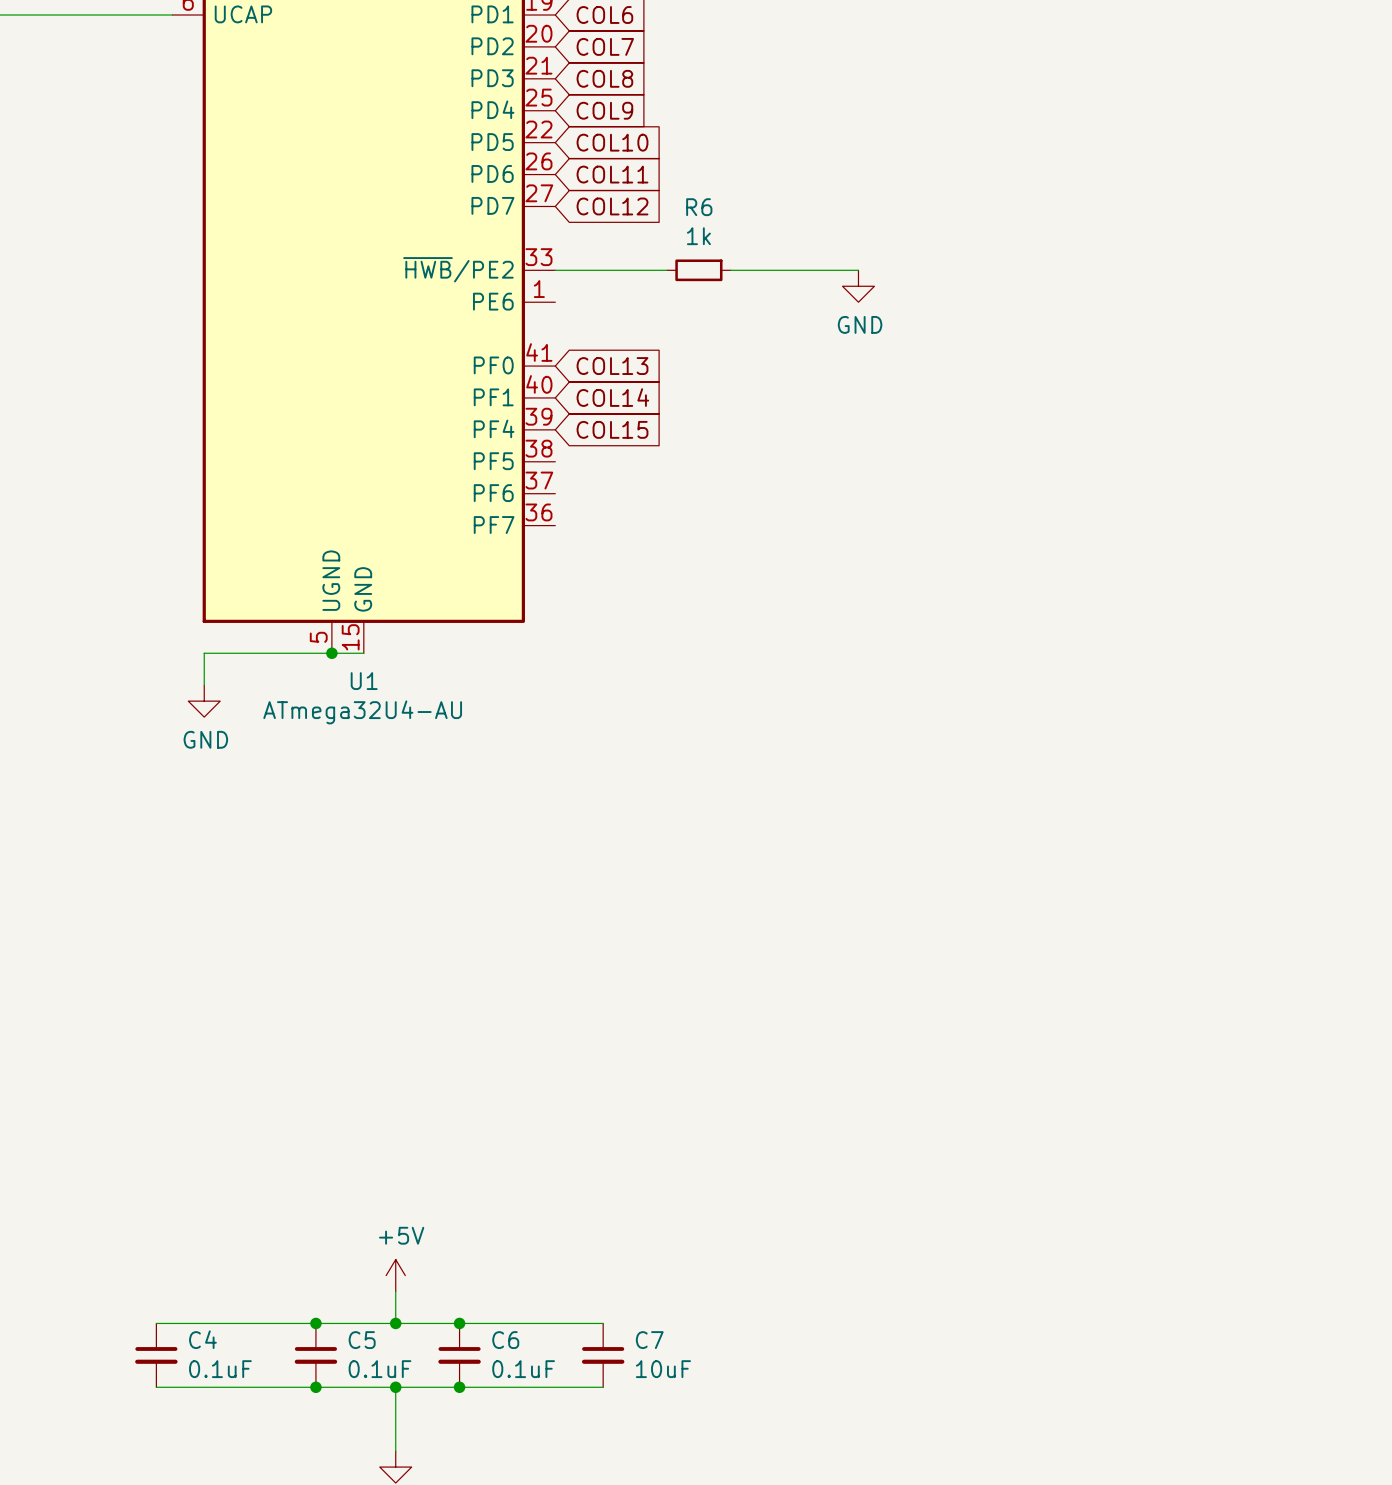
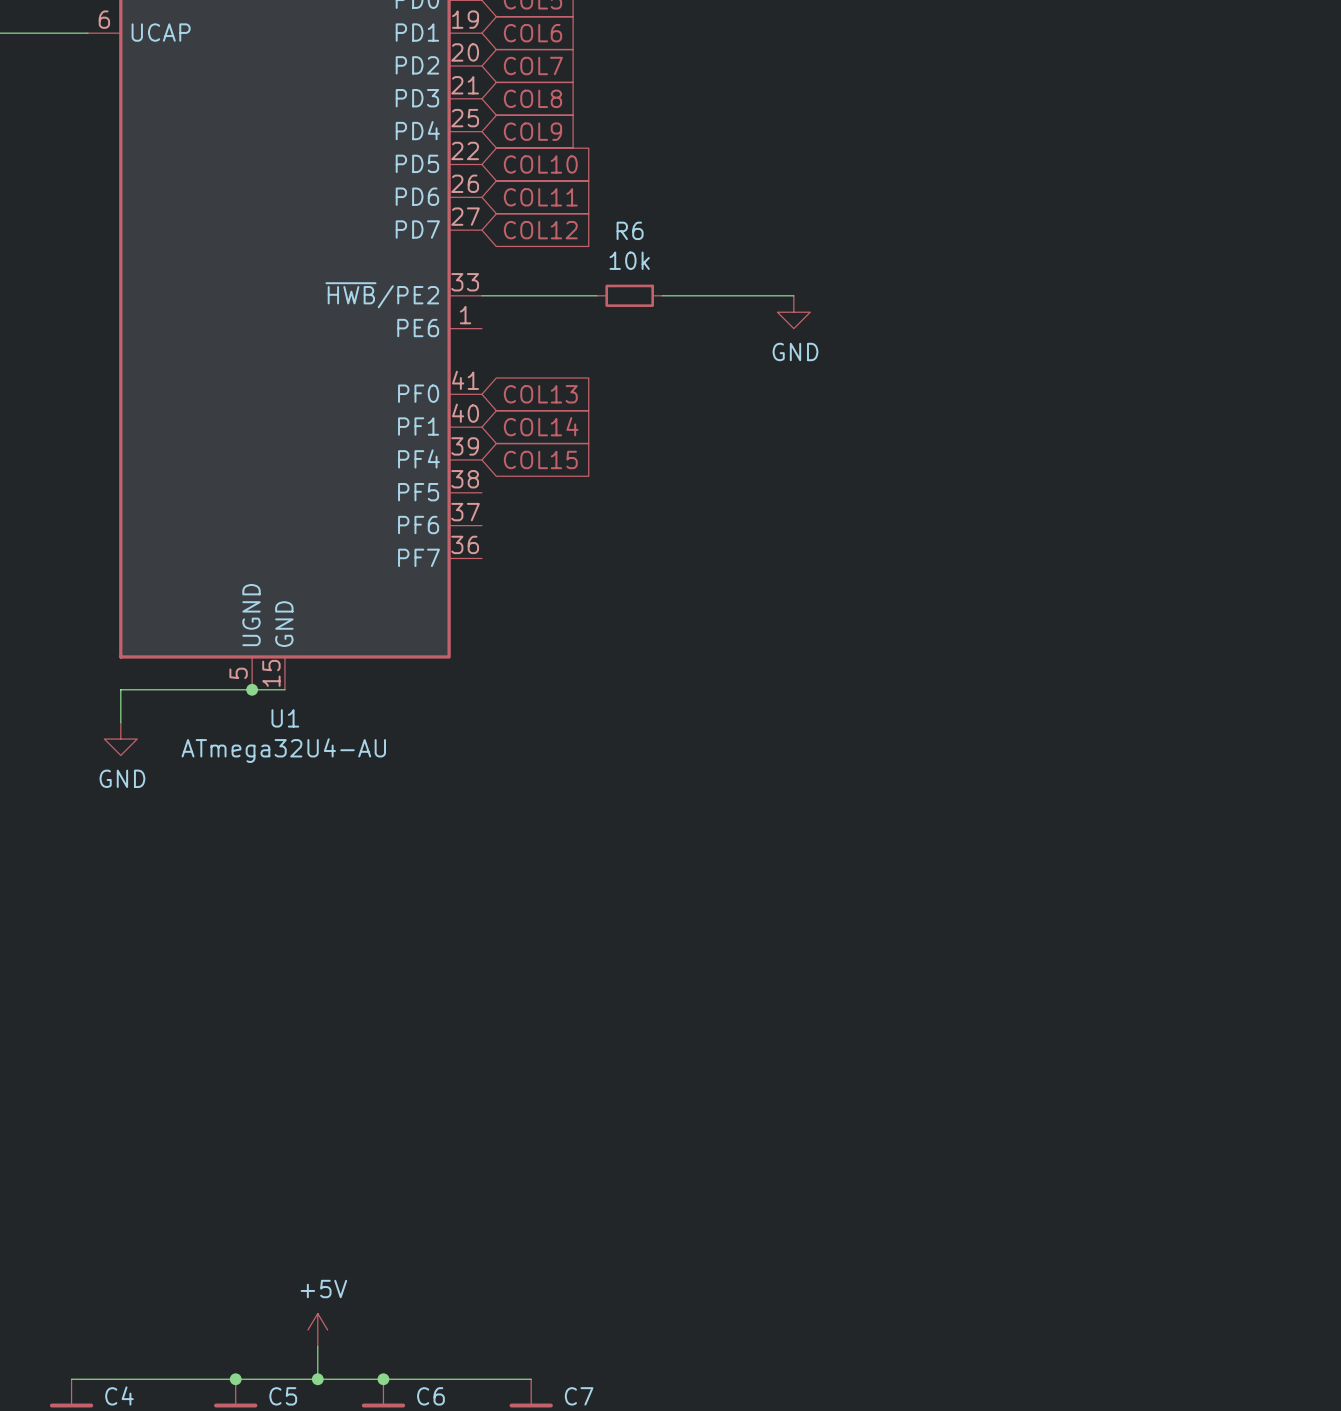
R6 value: 1k (698, 236) -> 10k (629, 260)

